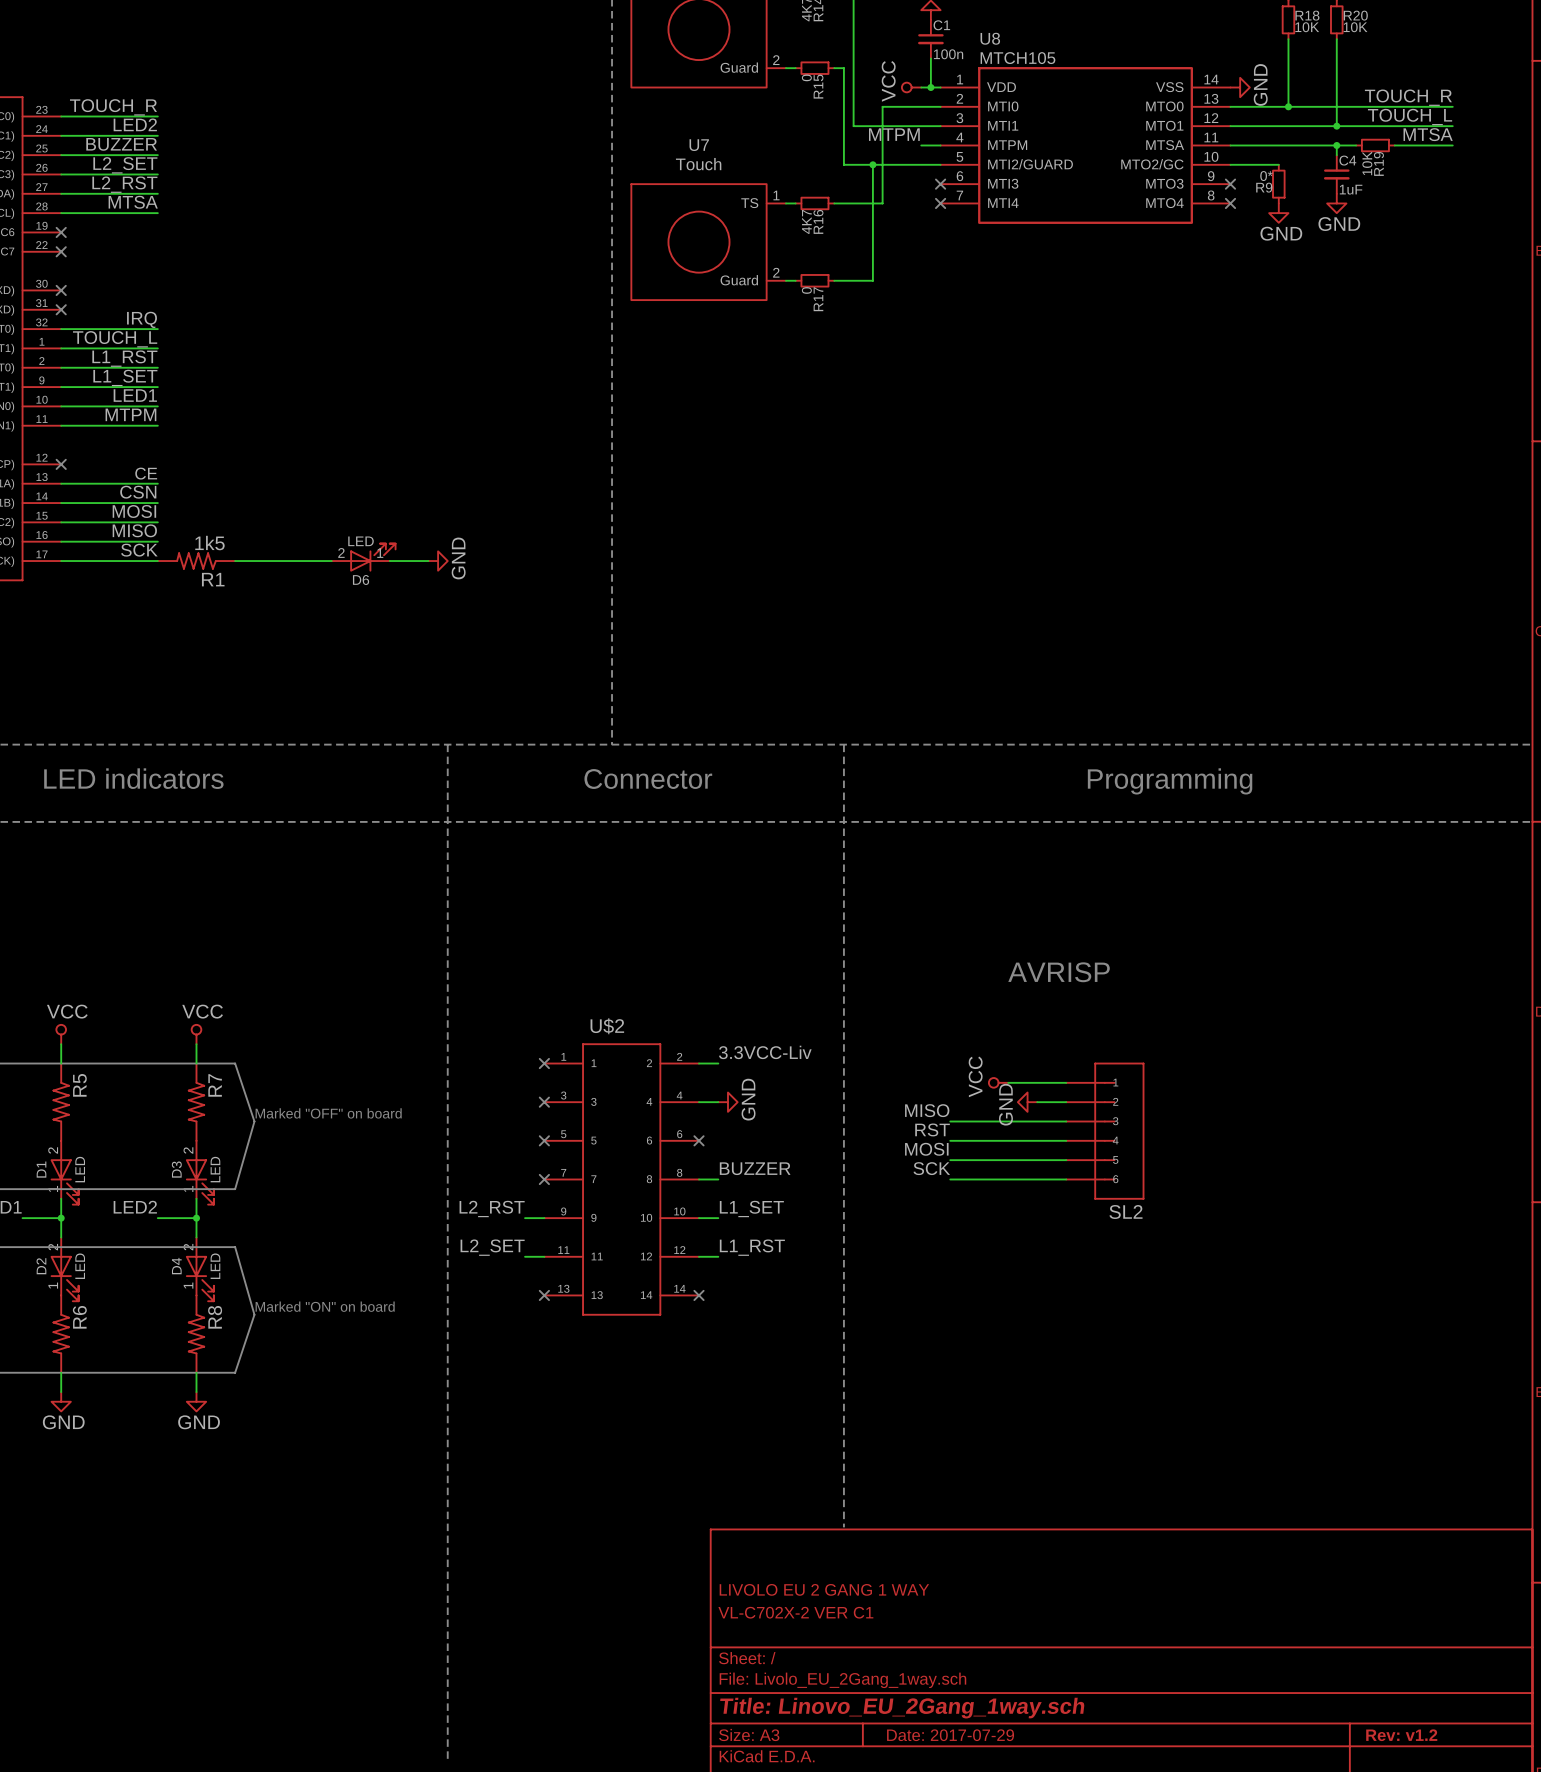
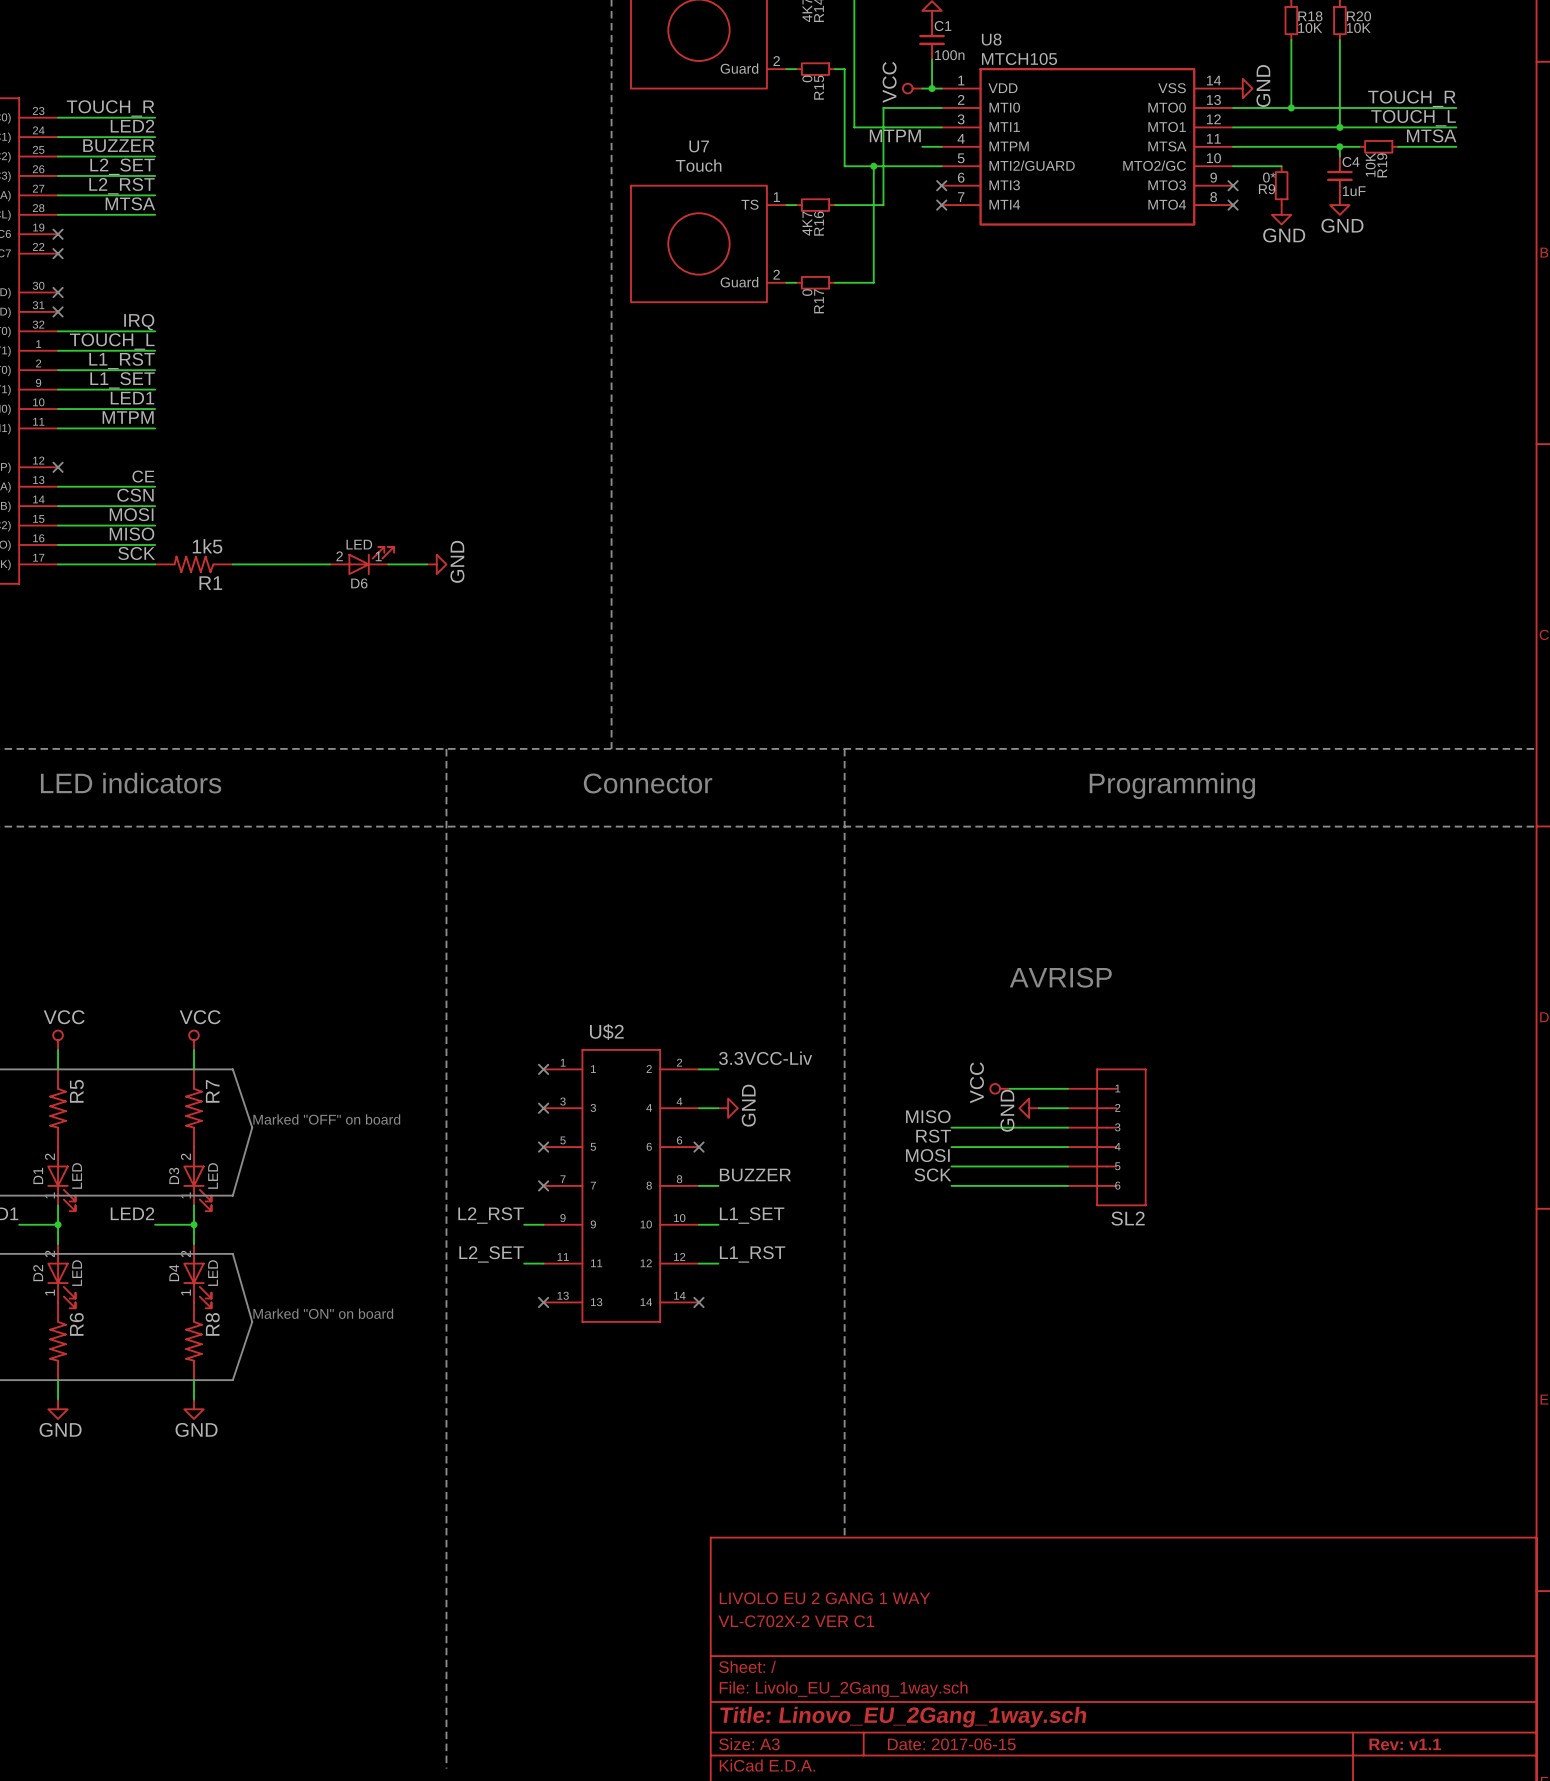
title block: Date: 2017-07-29 (950, 1735) -> Date: 2017-06-15 (951, 1744)
title block: Rev: v1.2 (1401, 1735) -> Rev: v1.1 (1405, 1744)

